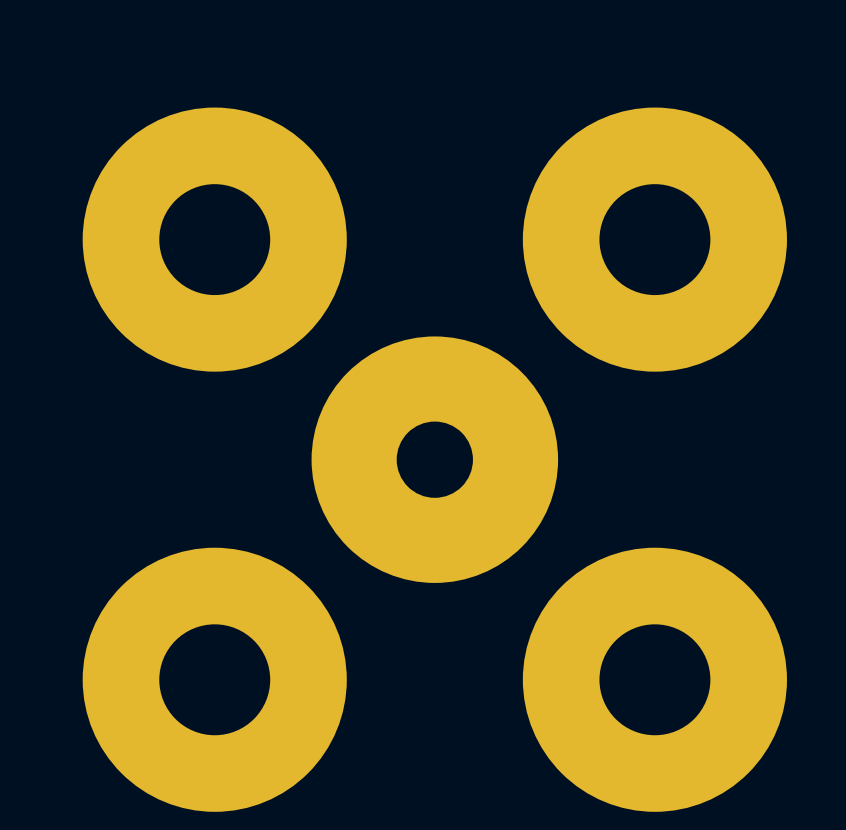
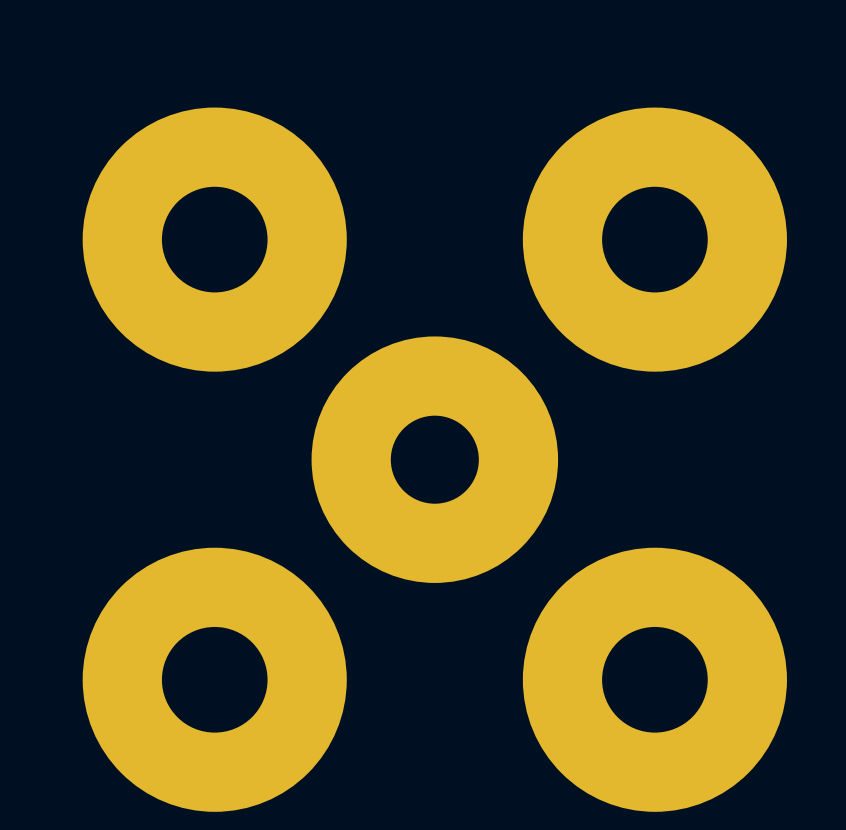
part footprint: [82, 107, 787, 812] -> [82, 107, 787, 812]

